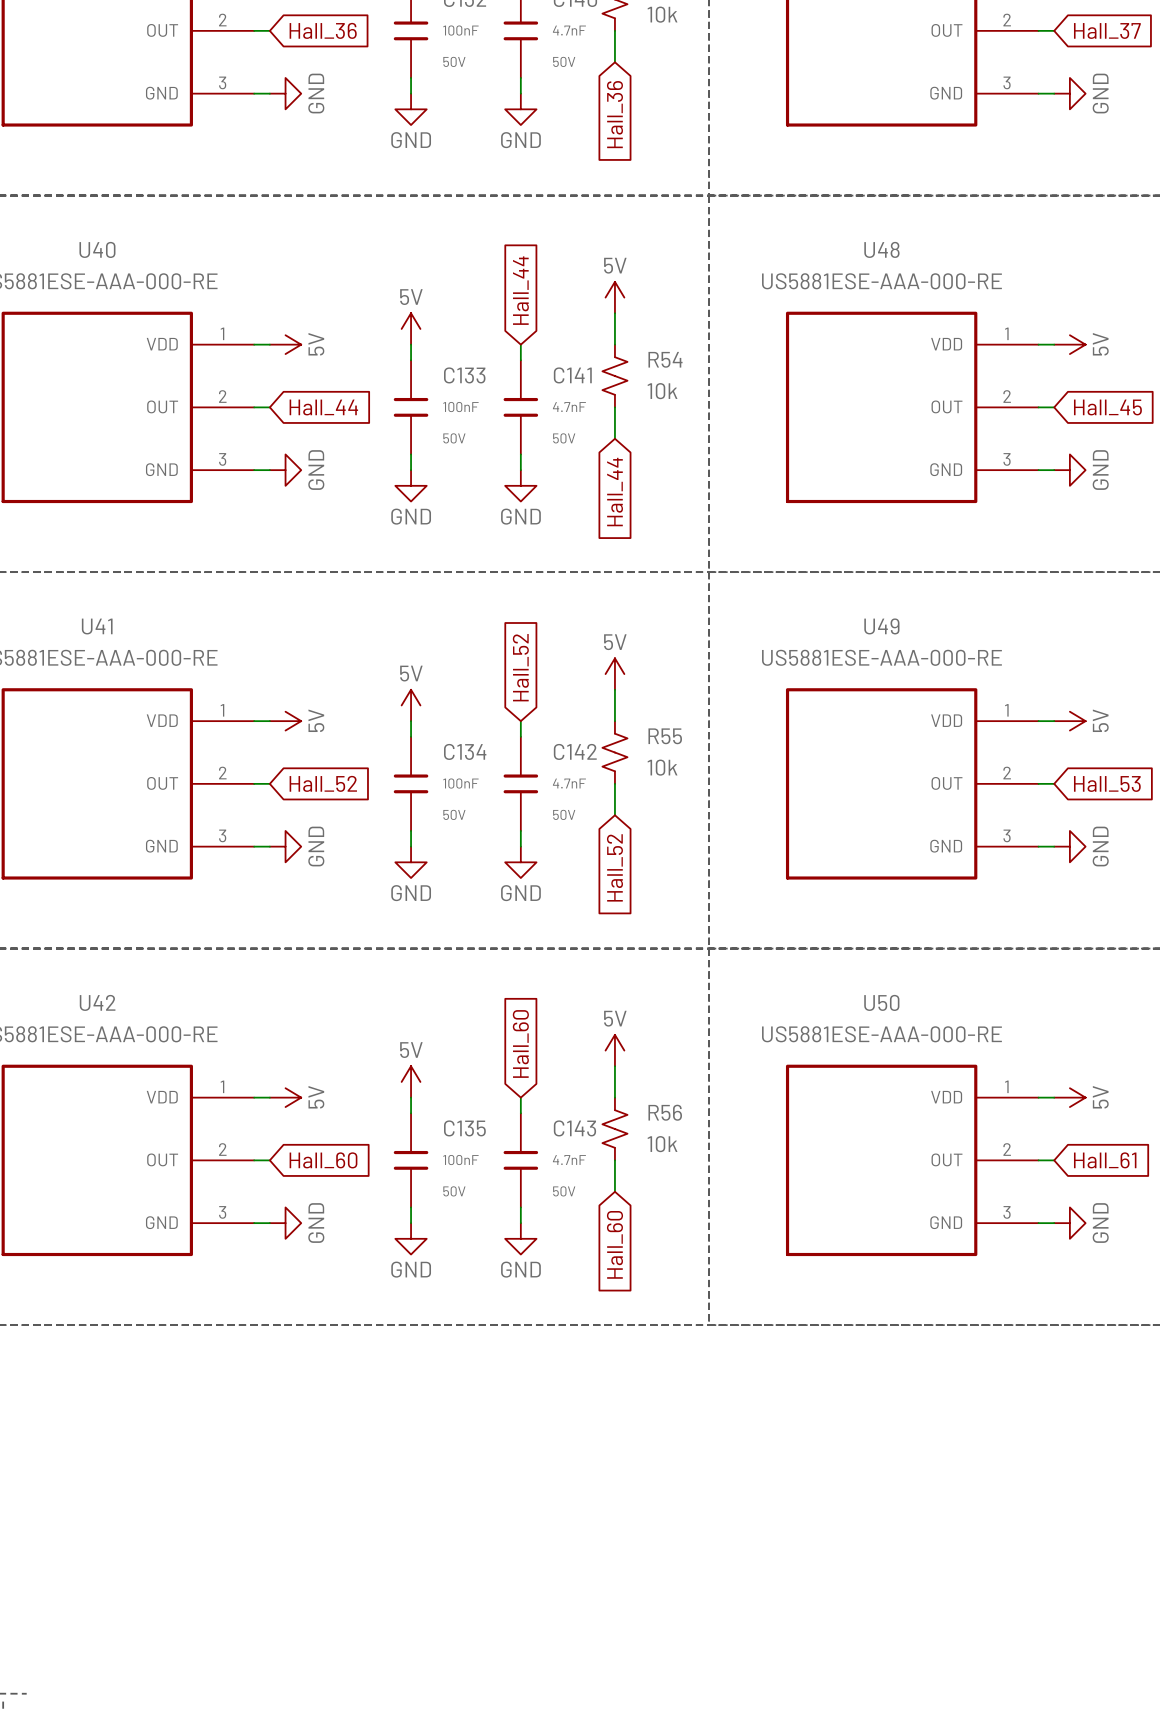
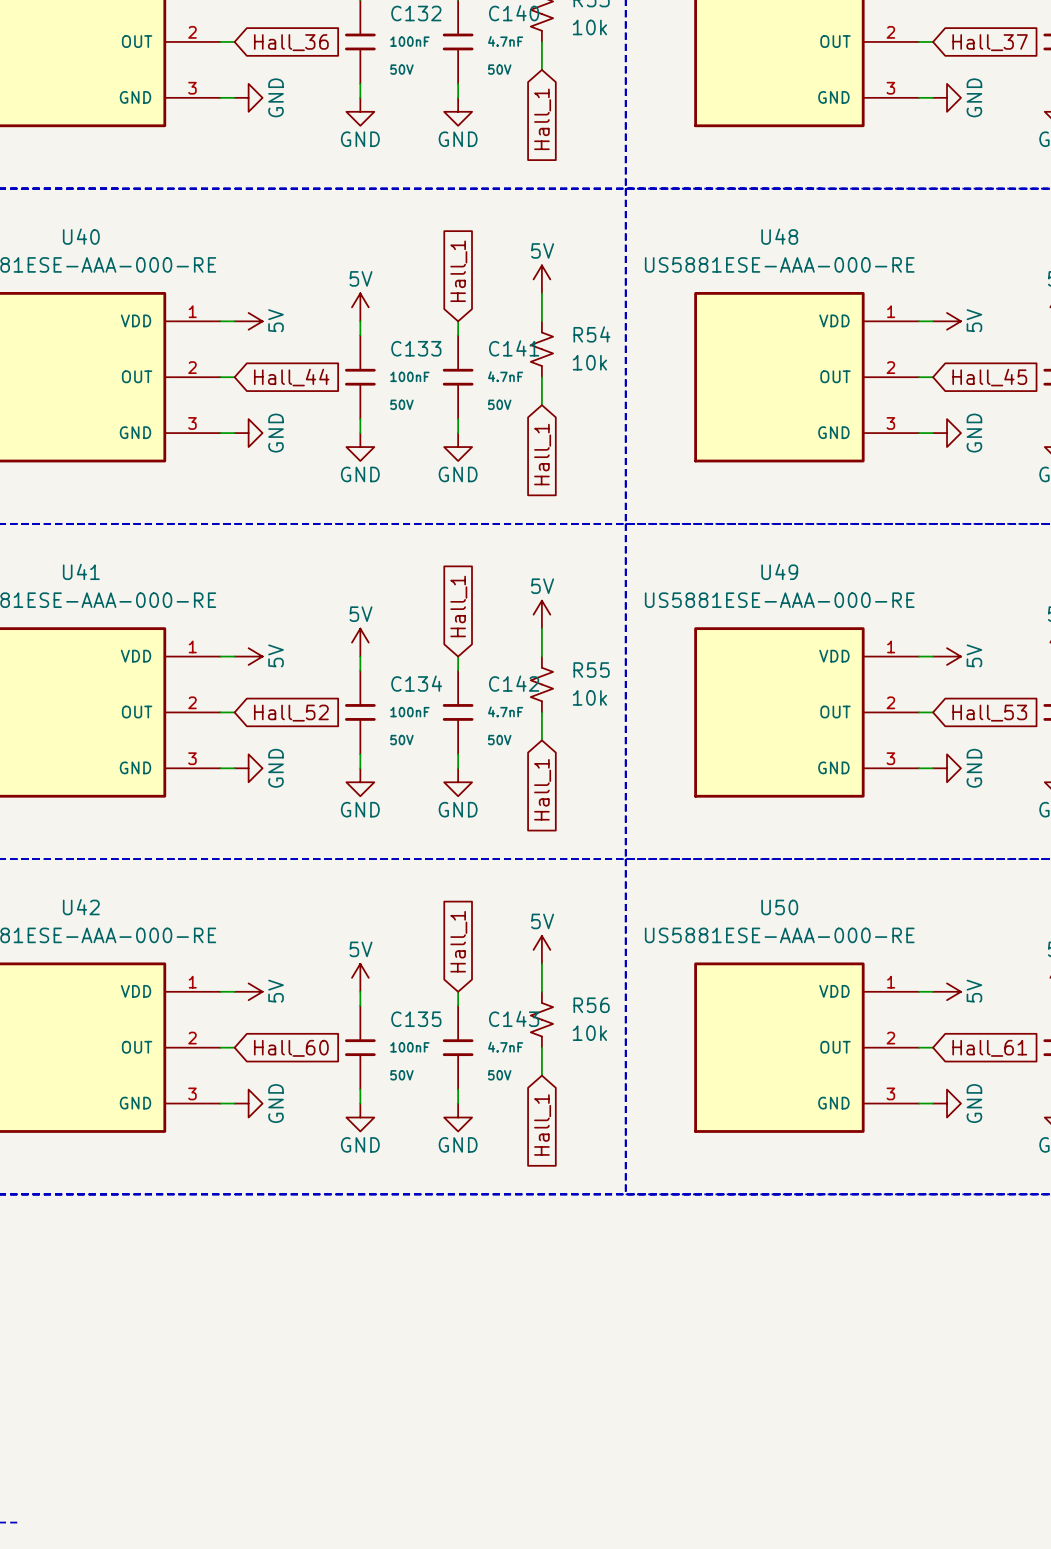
global label: Hall_36 (614, 114) -> Hall_1 (542, 119)
global label: Hall_44 (520, 290) -> Hall_1 (458, 271)
global label: Hall_44 (615, 492) -> Hall_1 (542, 454)
global label: Hall_52 (520, 667) -> Hall_1 (458, 606)
global label: Hall_52 (614, 867) -> Hall_1 (542, 789)
global label: Hall_60 (520, 1043) -> Hall_1 (458, 941)
global label: Hall_60 (614, 1244) -> Hall_1 (542, 1125)

